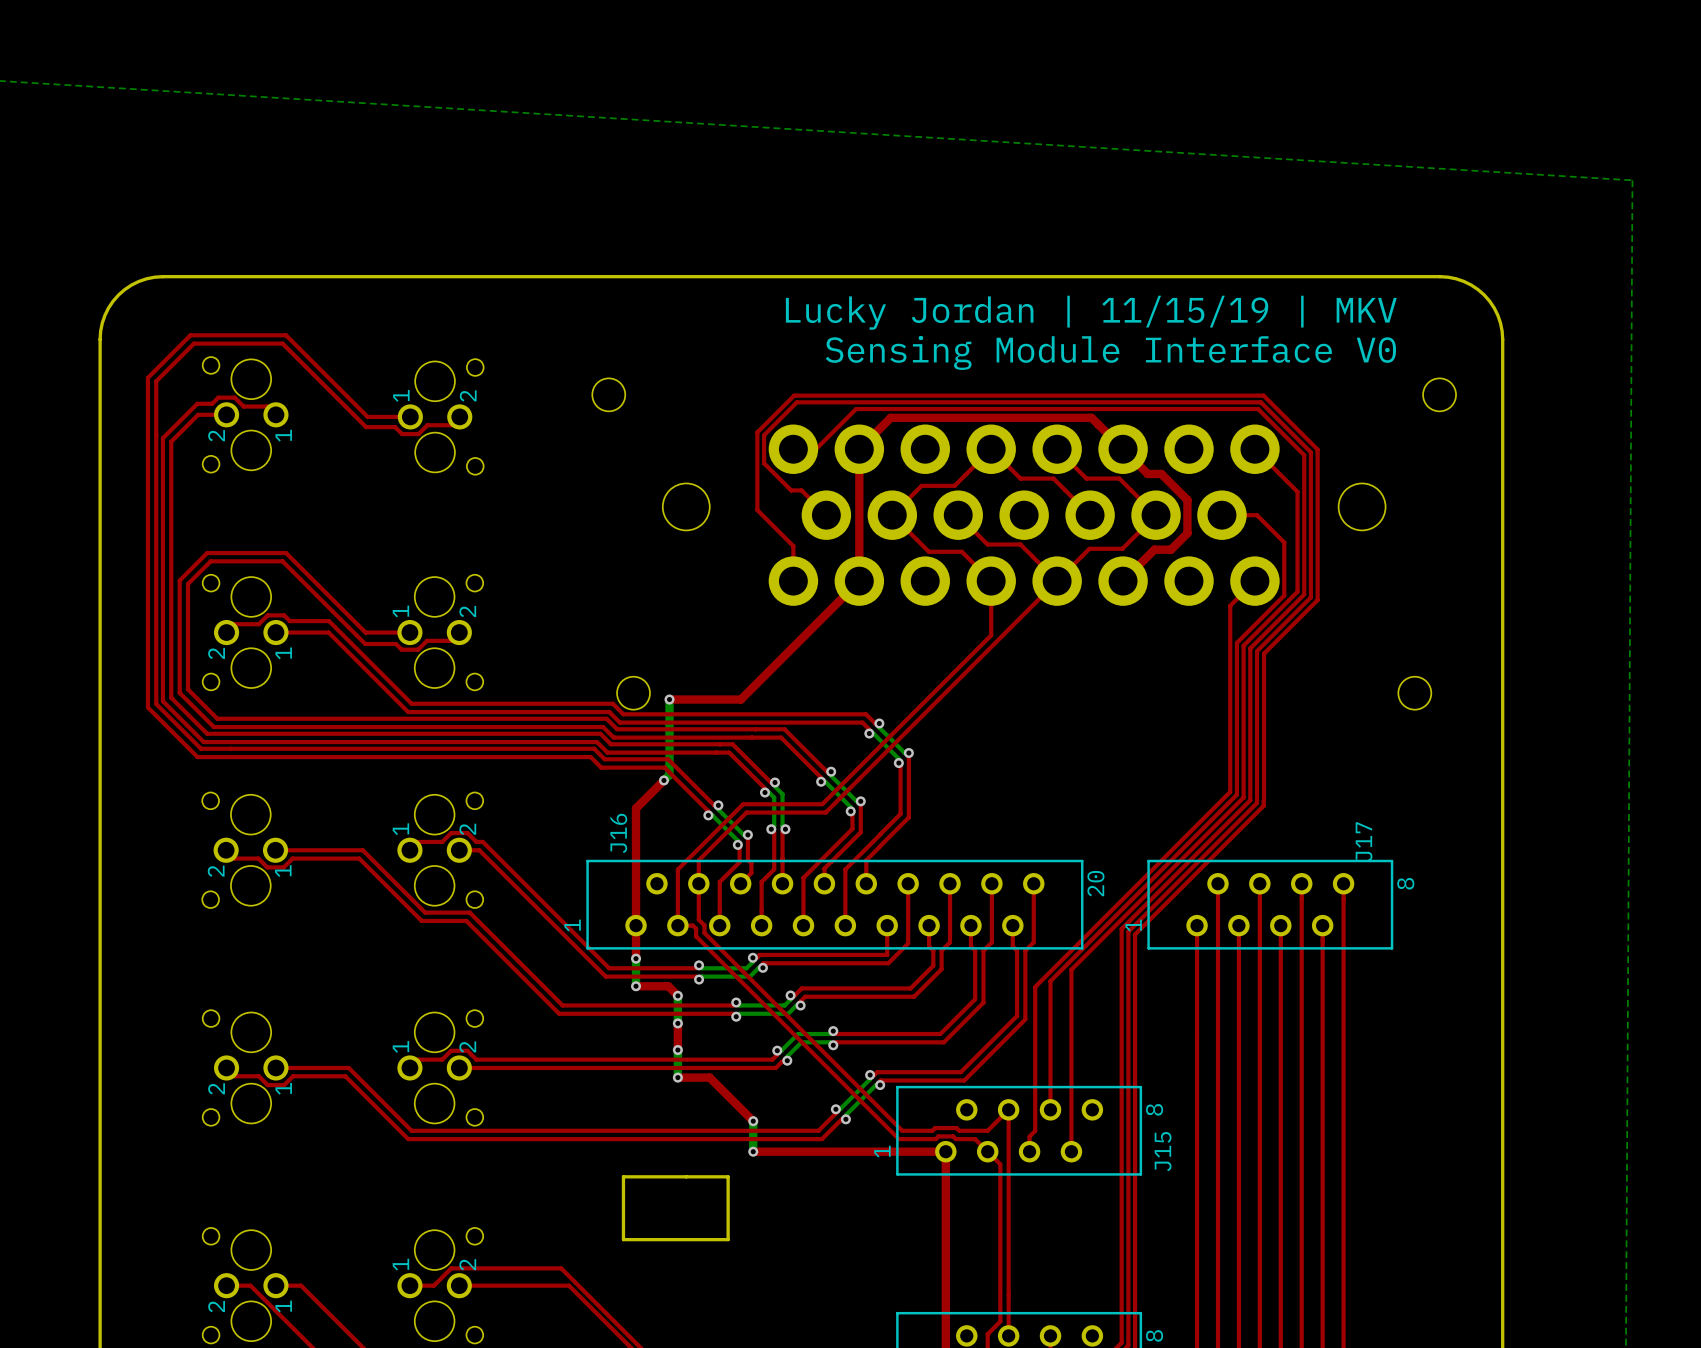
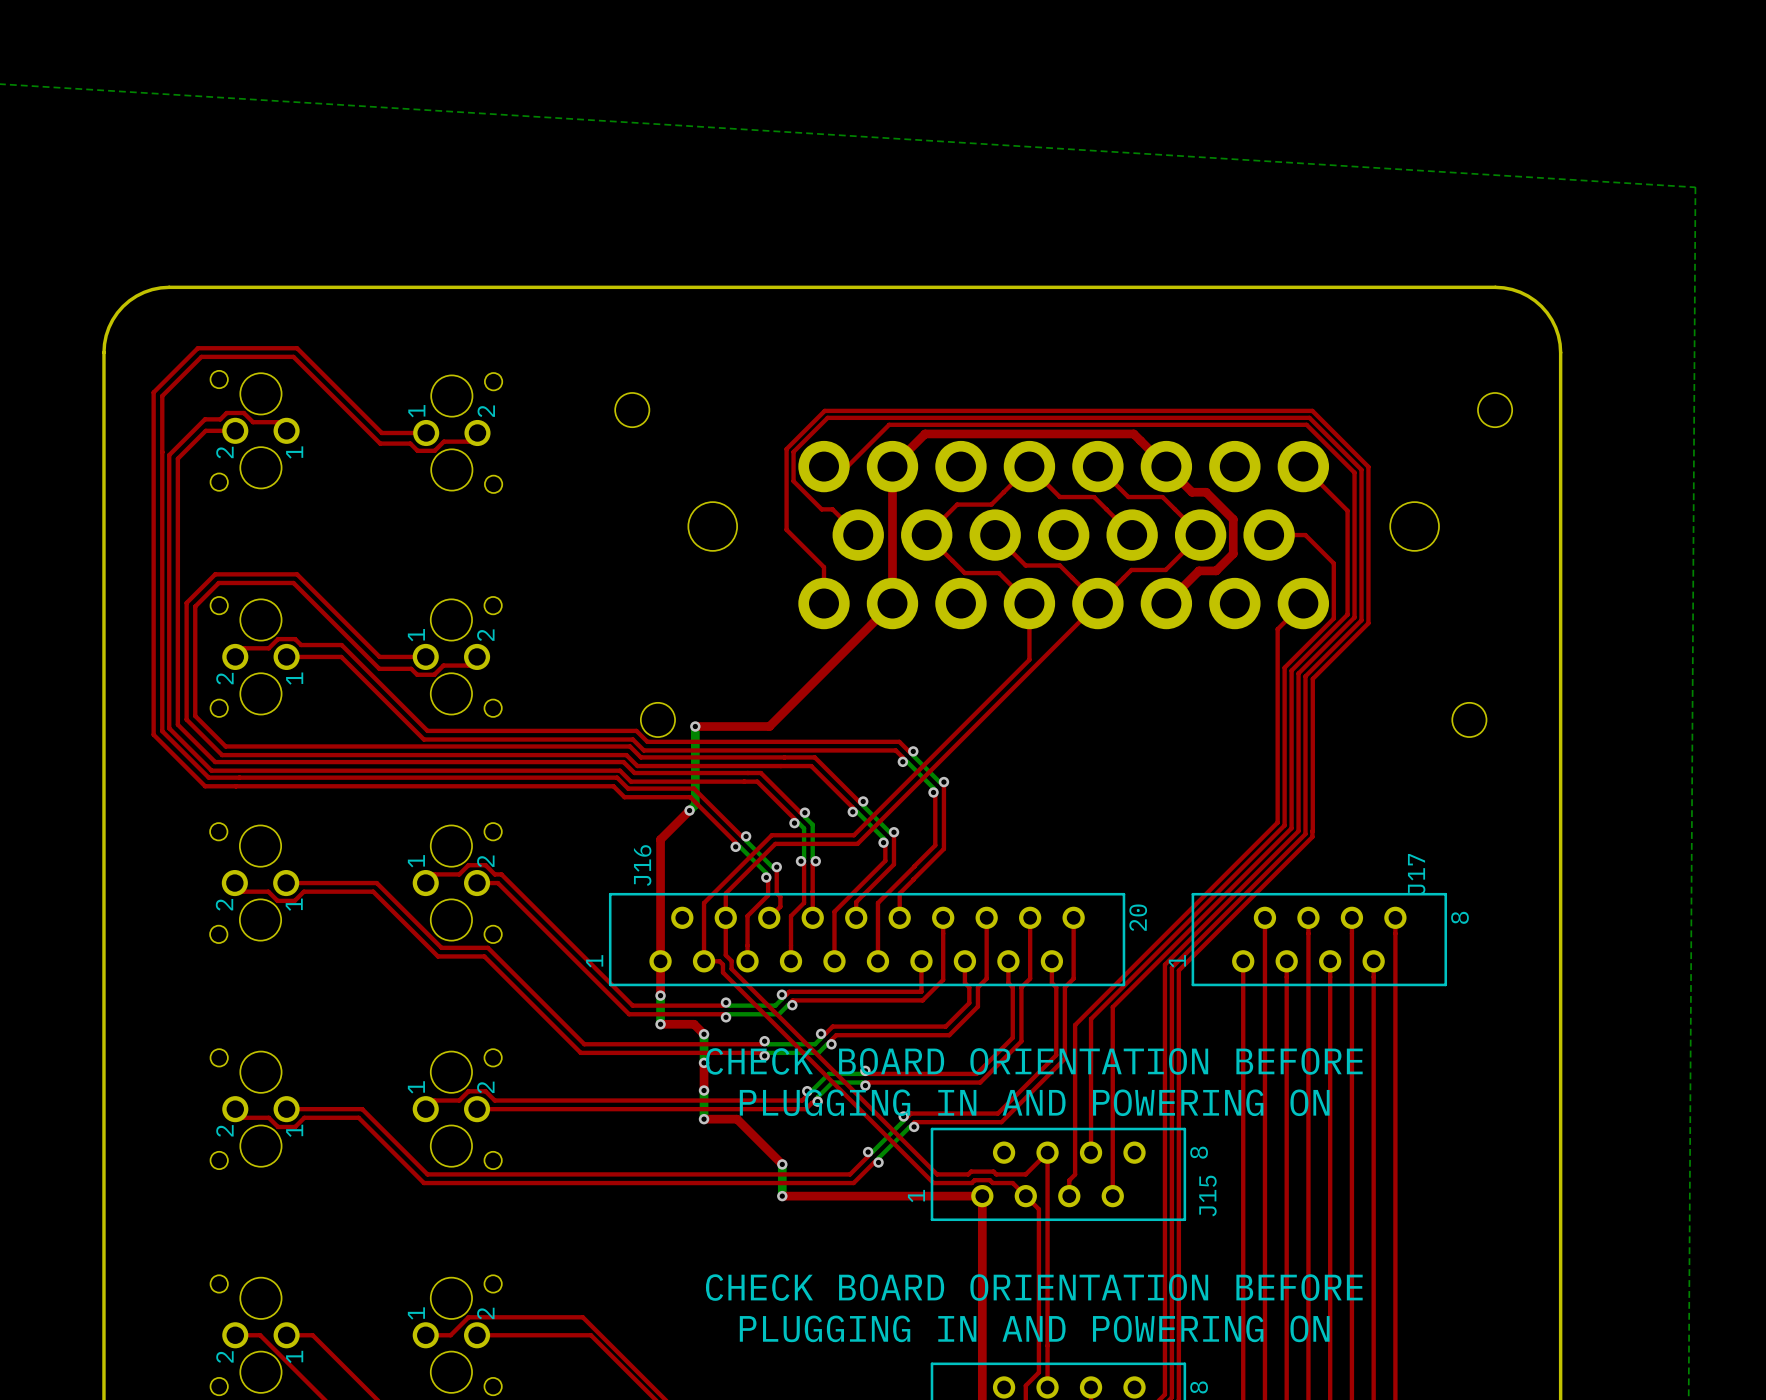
text: Lucky Jordan | 11/15/19 | MKV (1091, 312) -> none
text: Sensing Module Interface V0 (1110, 352) -> none
text: none -> CHECK BOARD ORIENTATION BEFORE (1034, 1061)
text: none -> PLUGGING IN AND POWERING ON (1034, 1102)
board edge: (623, 1176) (623, 1239) (728, 1239) (728, 1176) (623, 1176) -> none
text: none -> CHECK BOARD ORIENTATION BEFORE (1034, 1287)
text: none -> PLUGGING IN AND POWERING ON (1034, 1328)

